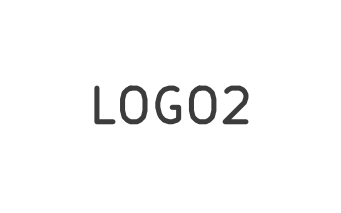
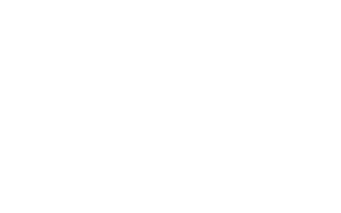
LOGO2: (171, 104) -> none

